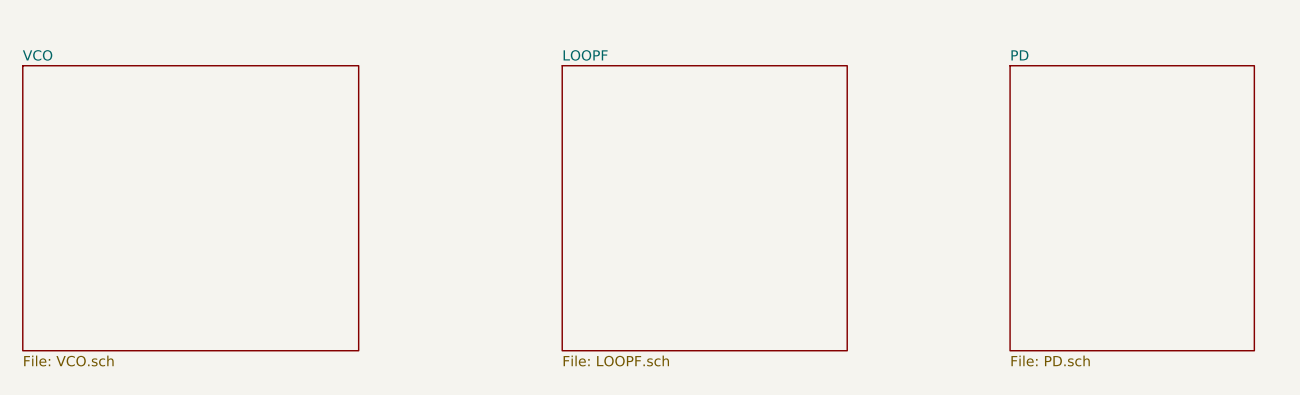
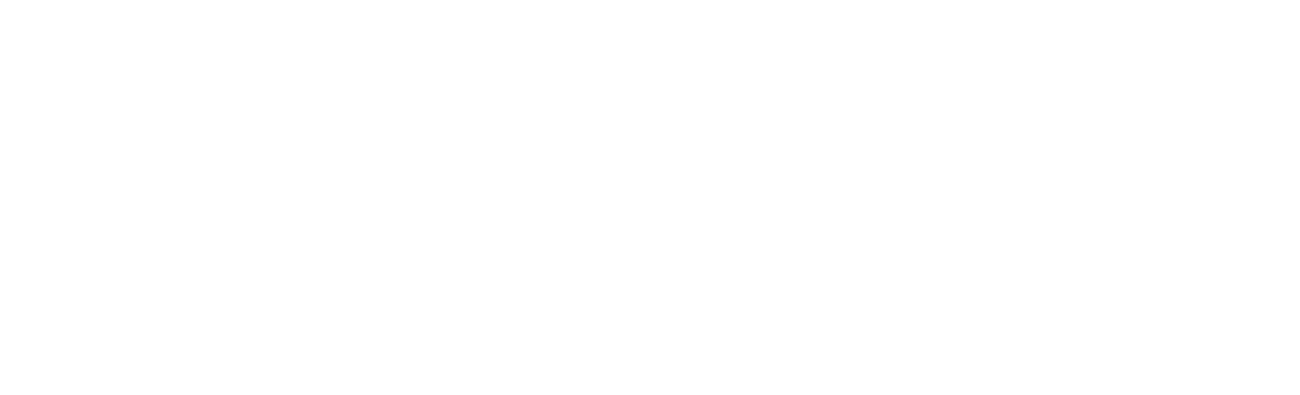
sheet VCO: File: VCO.sch (190, 208) -> none
sheet LOOPF: File: LOOPF.sch (704, 208) -> none
sheet PD: File: PD.sch (1132, 208) -> none

